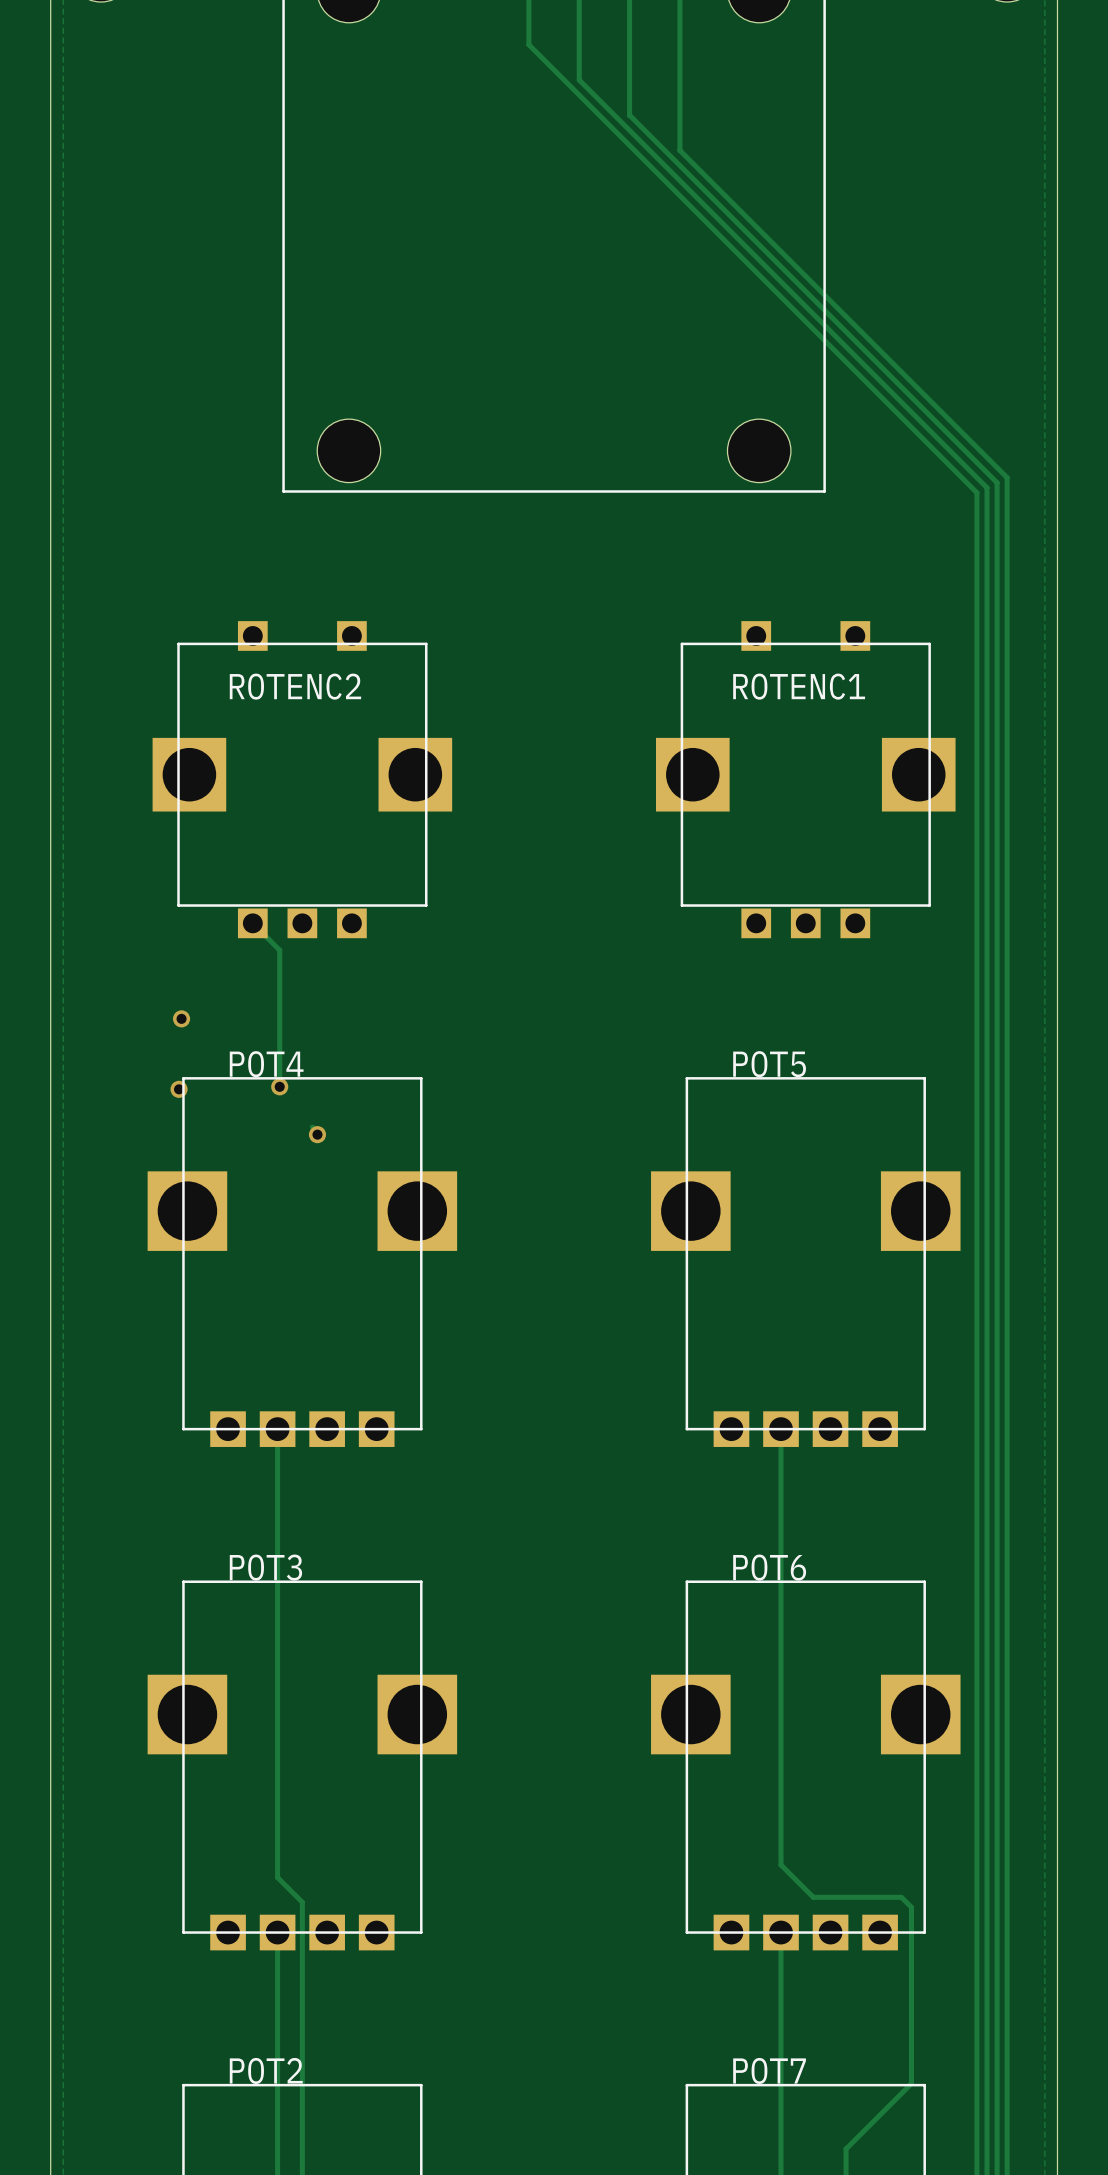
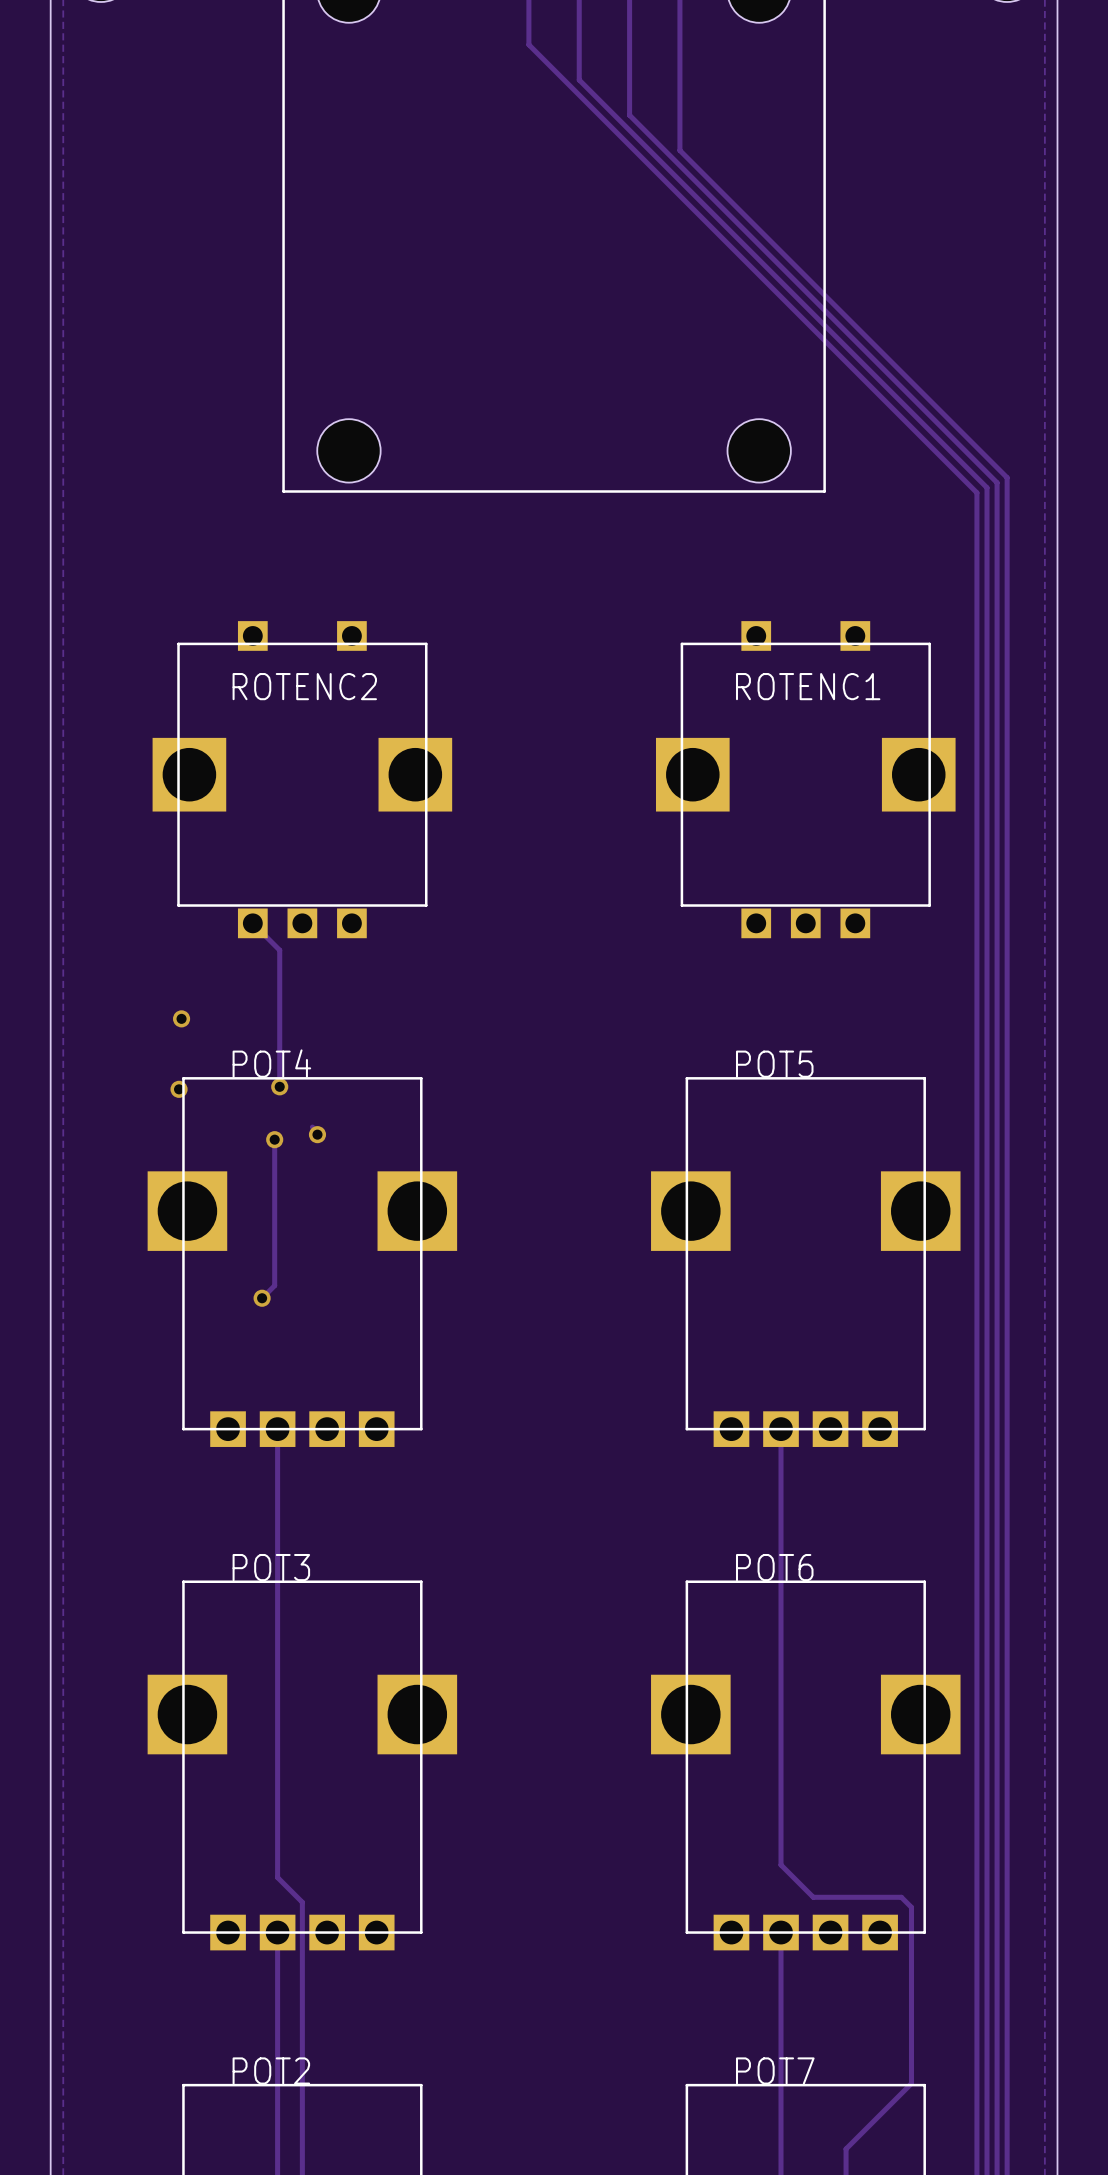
track: none -> (274, 1139) (274, 1285) (262, 1298)
via: none -> (274, 1139)
via: none -> (262, 1298)

